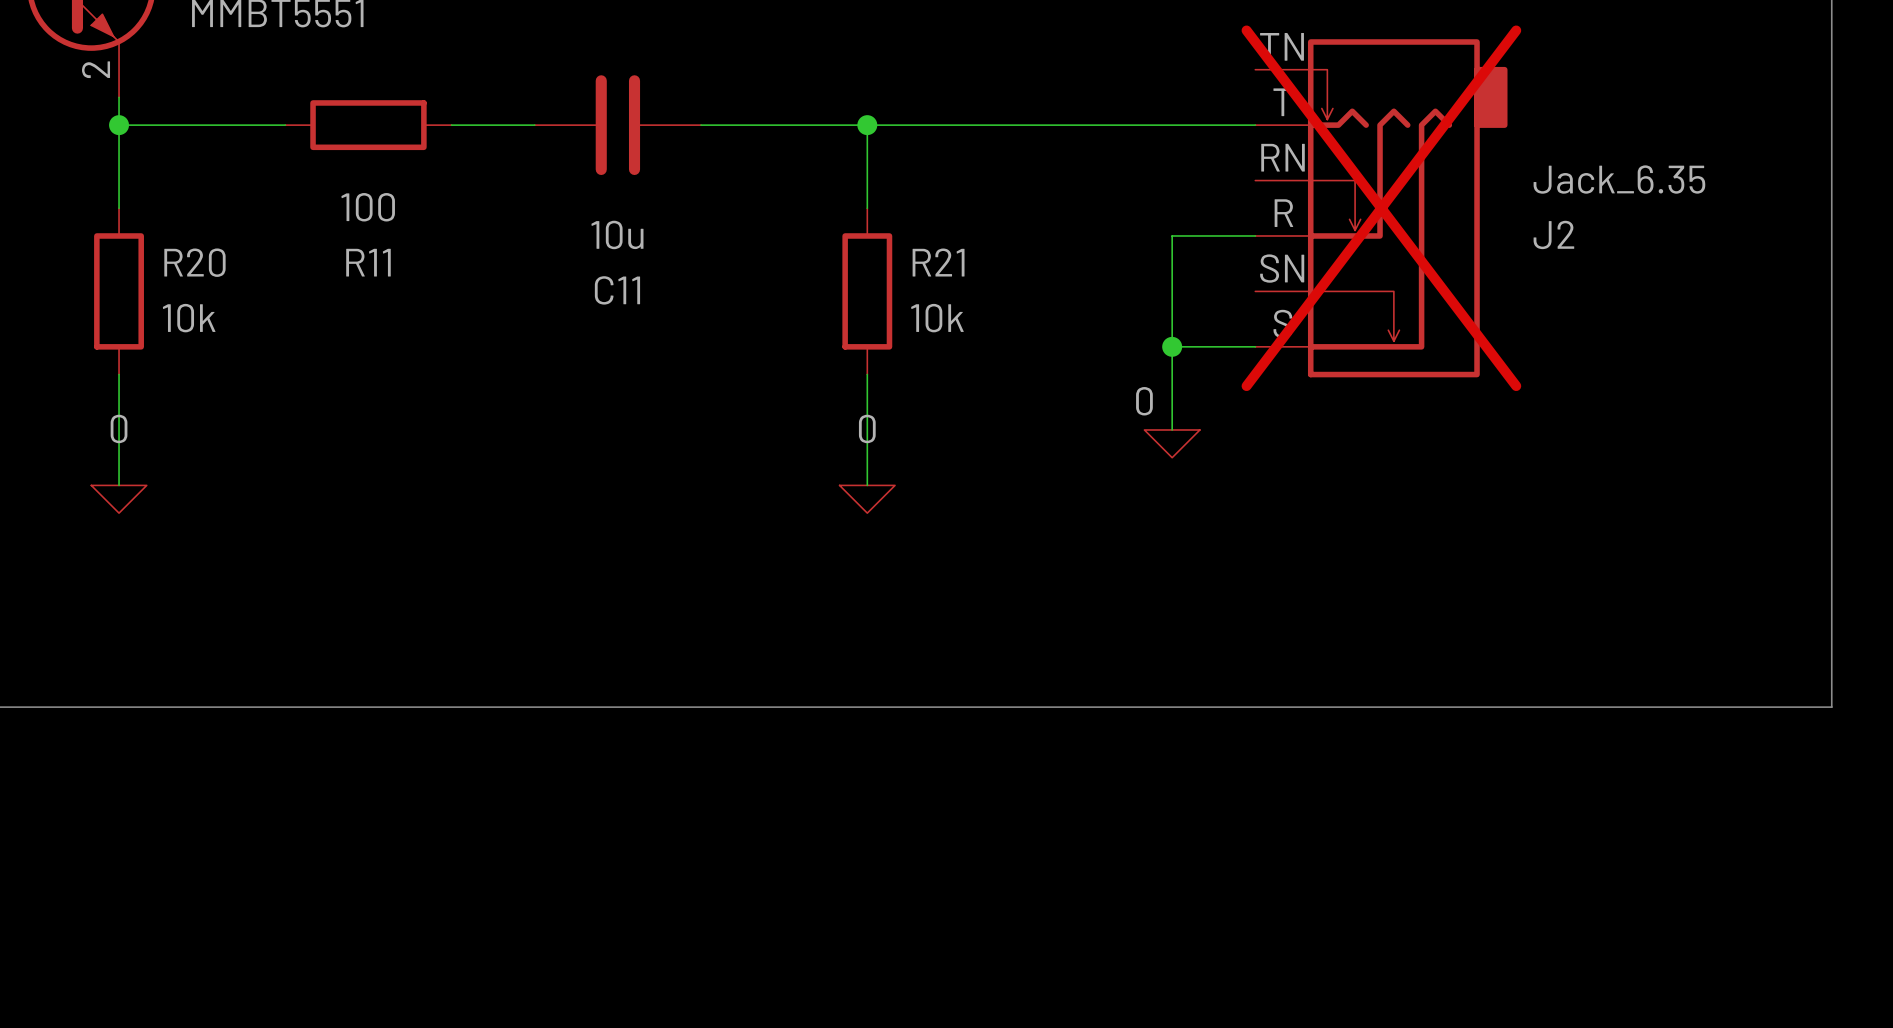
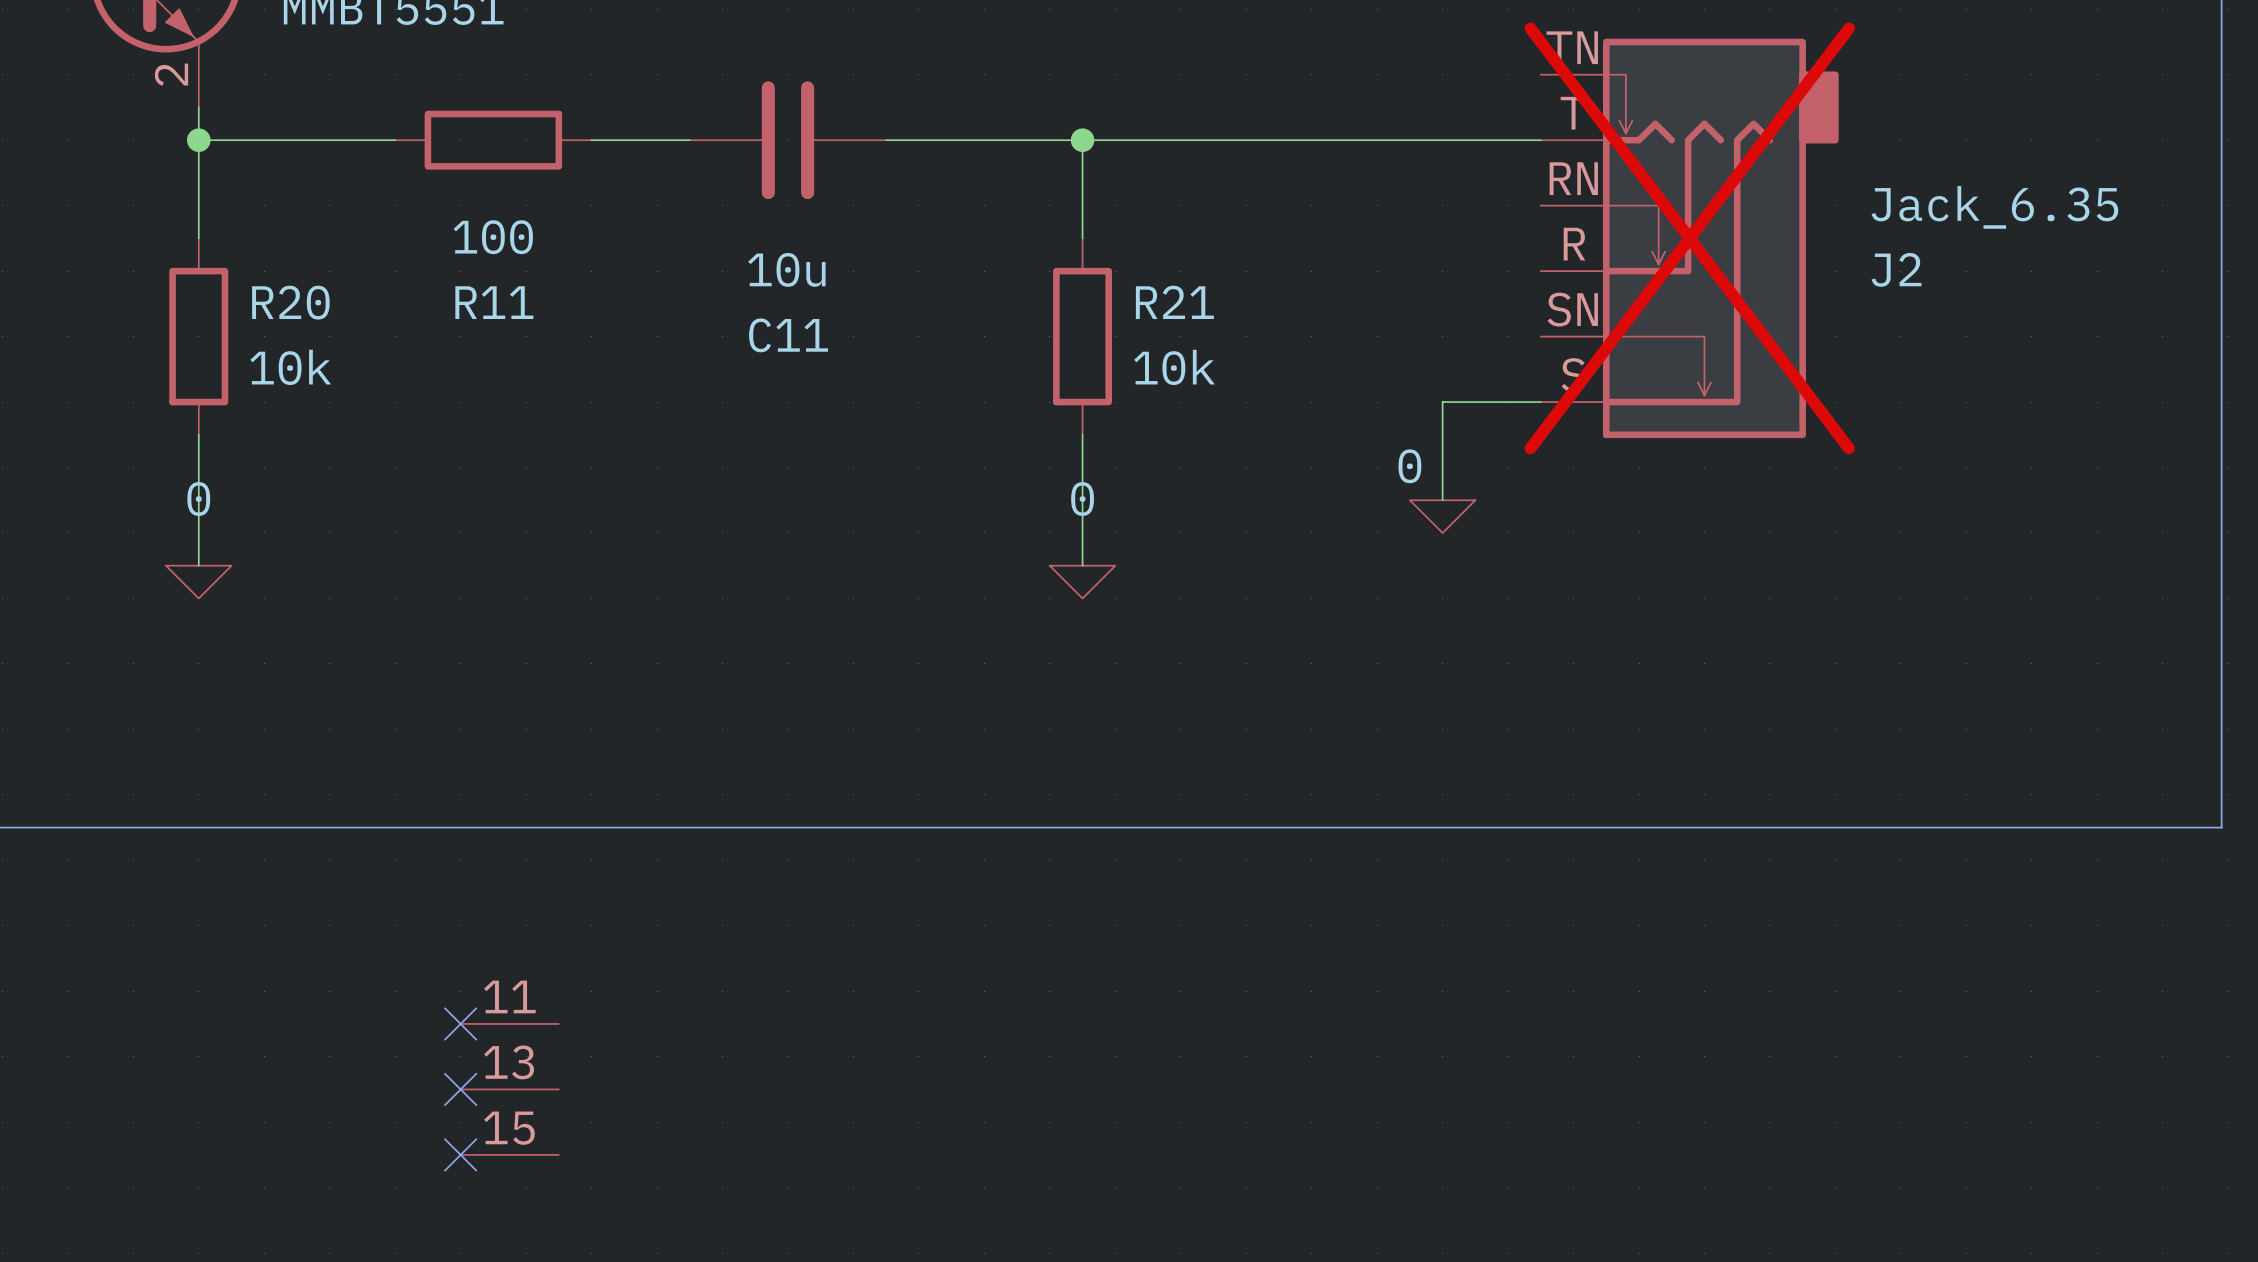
wire: (1255, 235) (1172, 235) (1172, 346) -> none
junction: (1172, 346) -> none
no-connect mark: none -> (460, 1023)
no-connect mark: none -> (460, 1089)
part: none -> (509, 1089)
no-connect mark: none -> (460, 1154)

